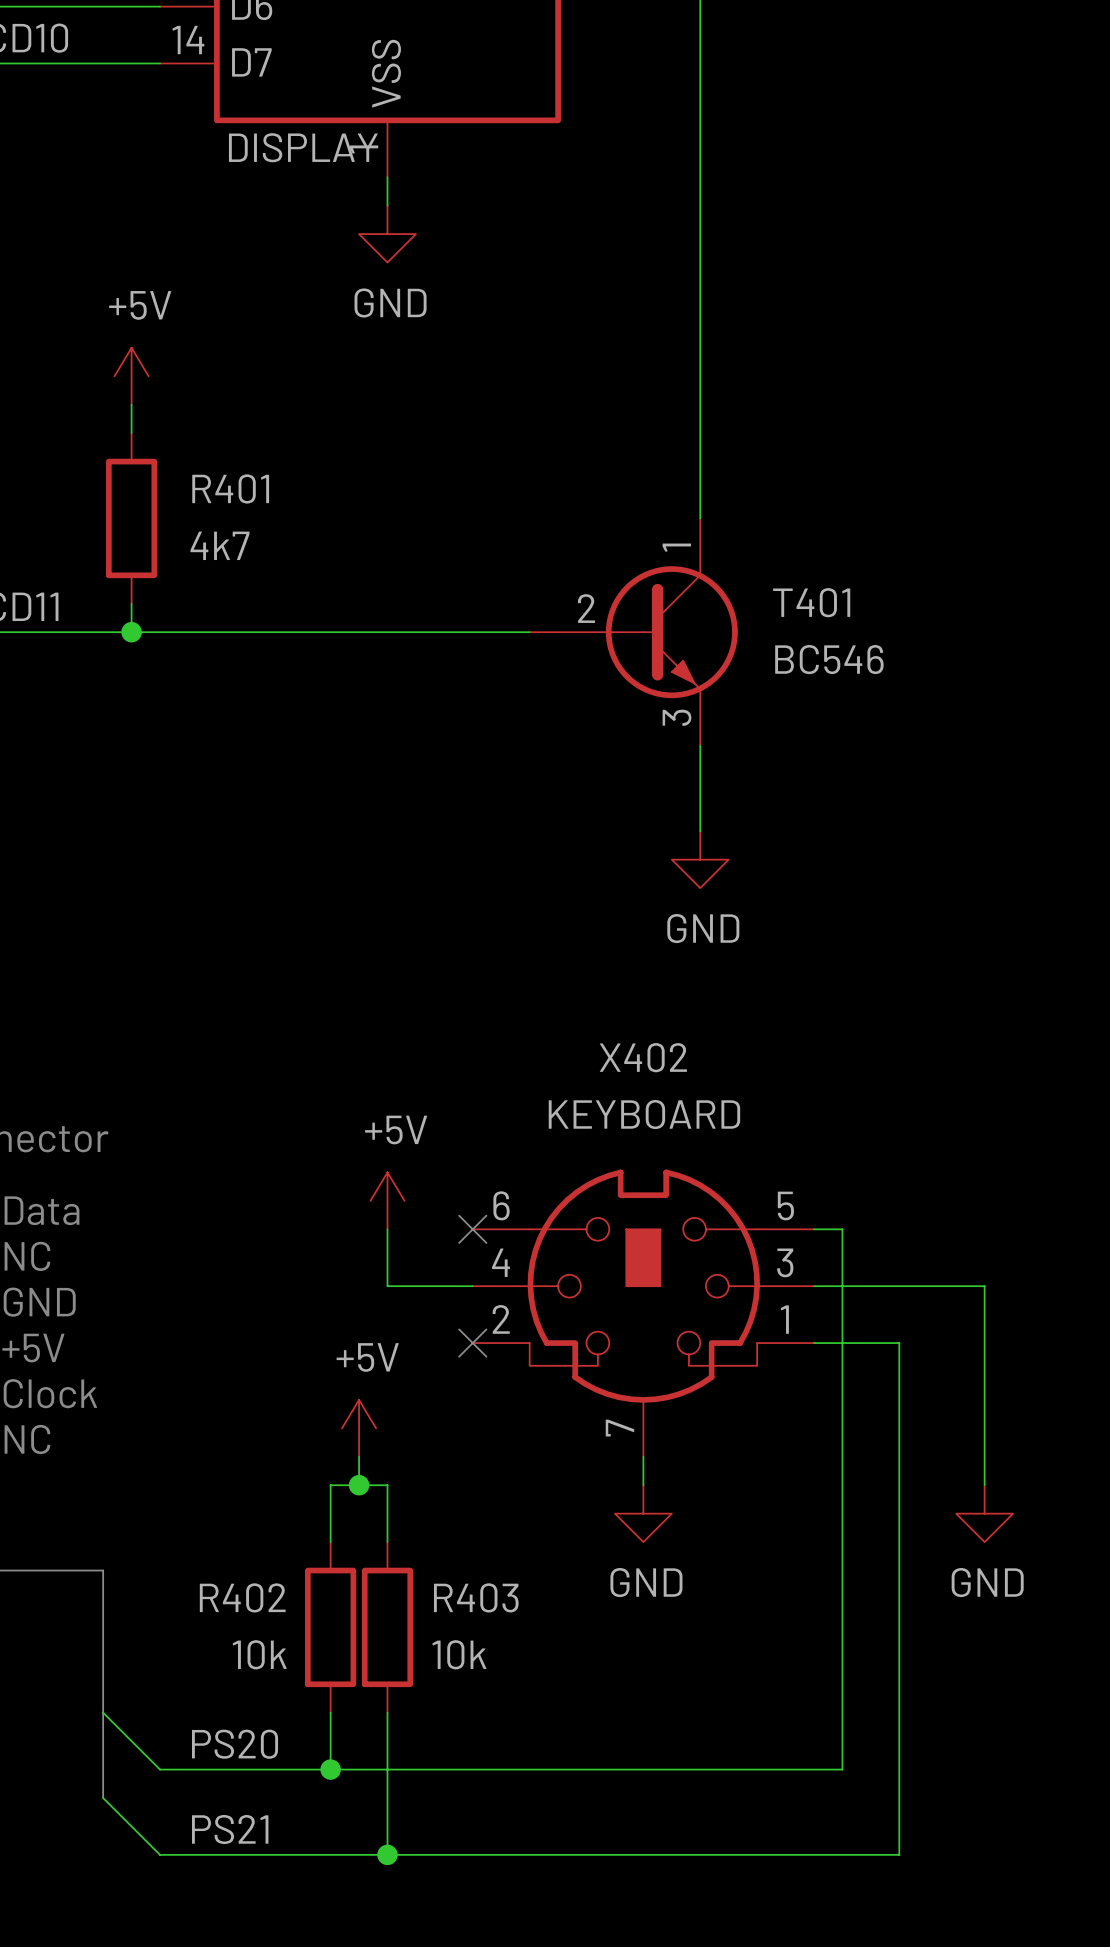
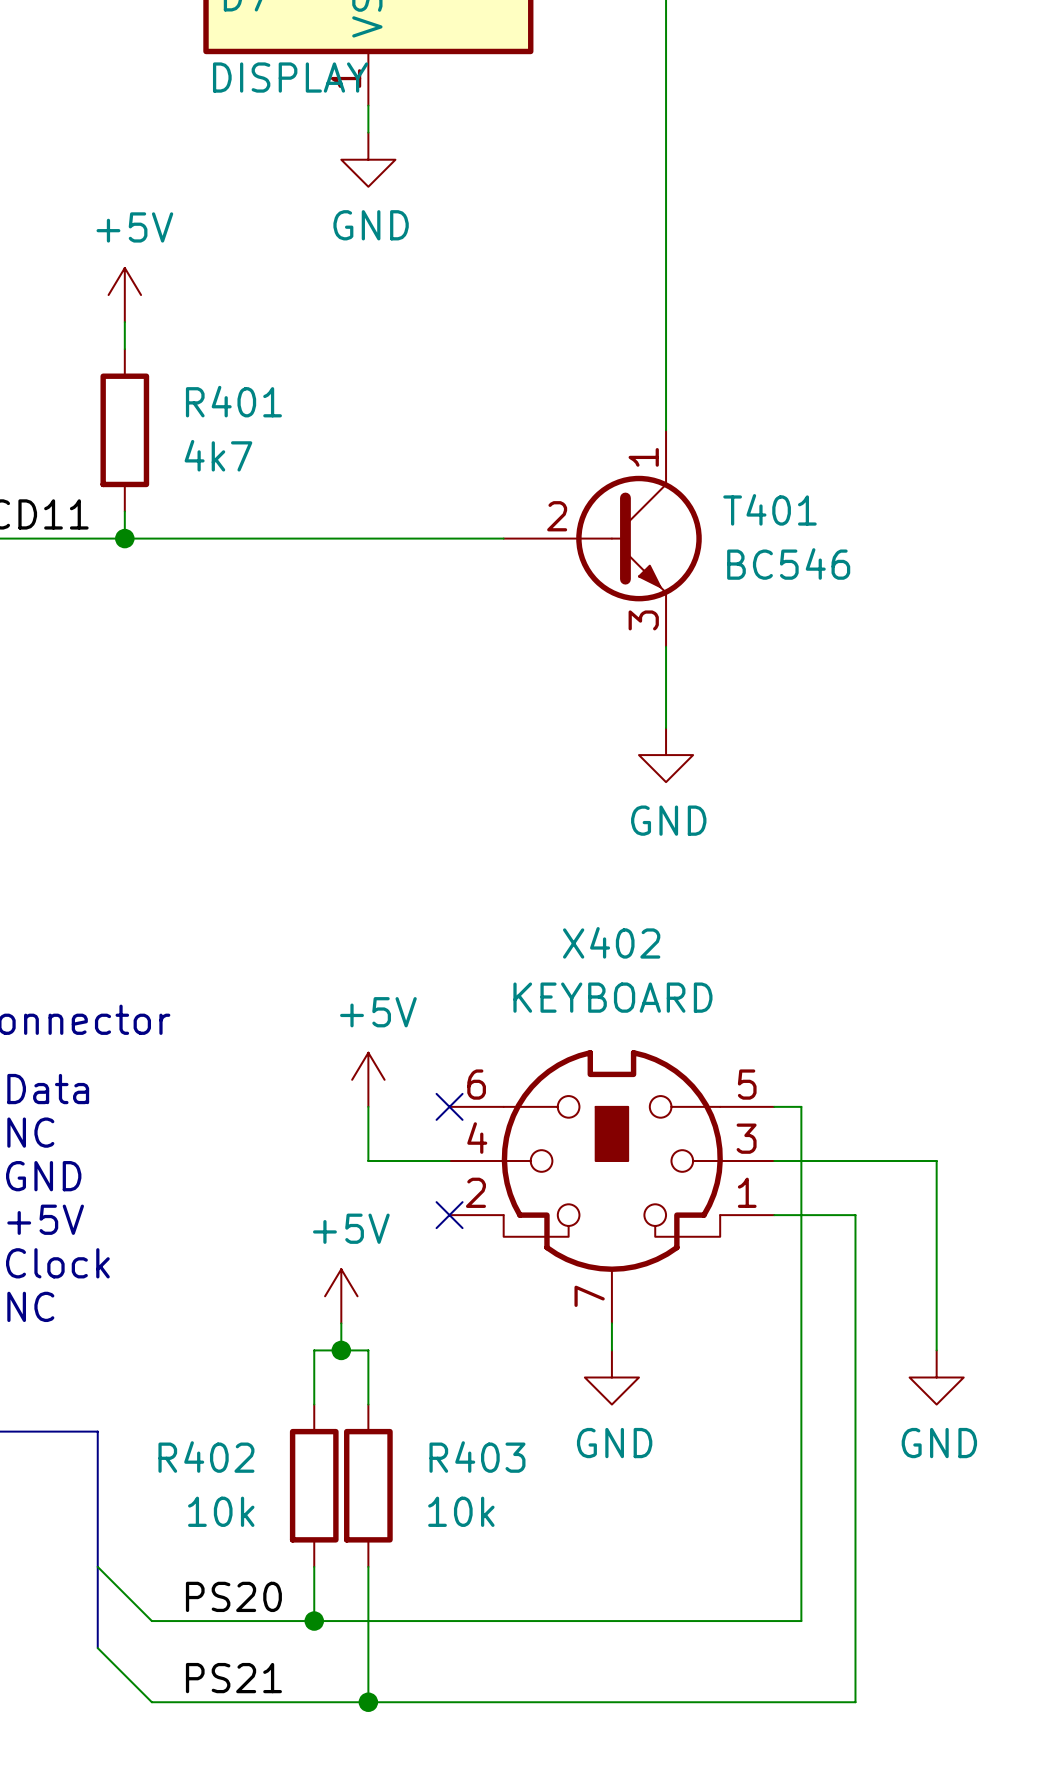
part value position: DISPLAY (303, 147) -> DISPLAY (290, 77)
T401 name position: T401 (811, 602) -> T401 (769, 509)
T401 value position: BC546 (829, 659) -> BC546 (788, 563)
R402 name position: R402 (242, 1597) -> R402 (206, 1457)
R403 name position: R403 (476, 1597) -> R403 (477, 1457)
R402 value position: 10k (259, 1654) -> 10k (221, 1511)
R403 value position: 10k (459, 1654) -> 10k (461, 1511)

